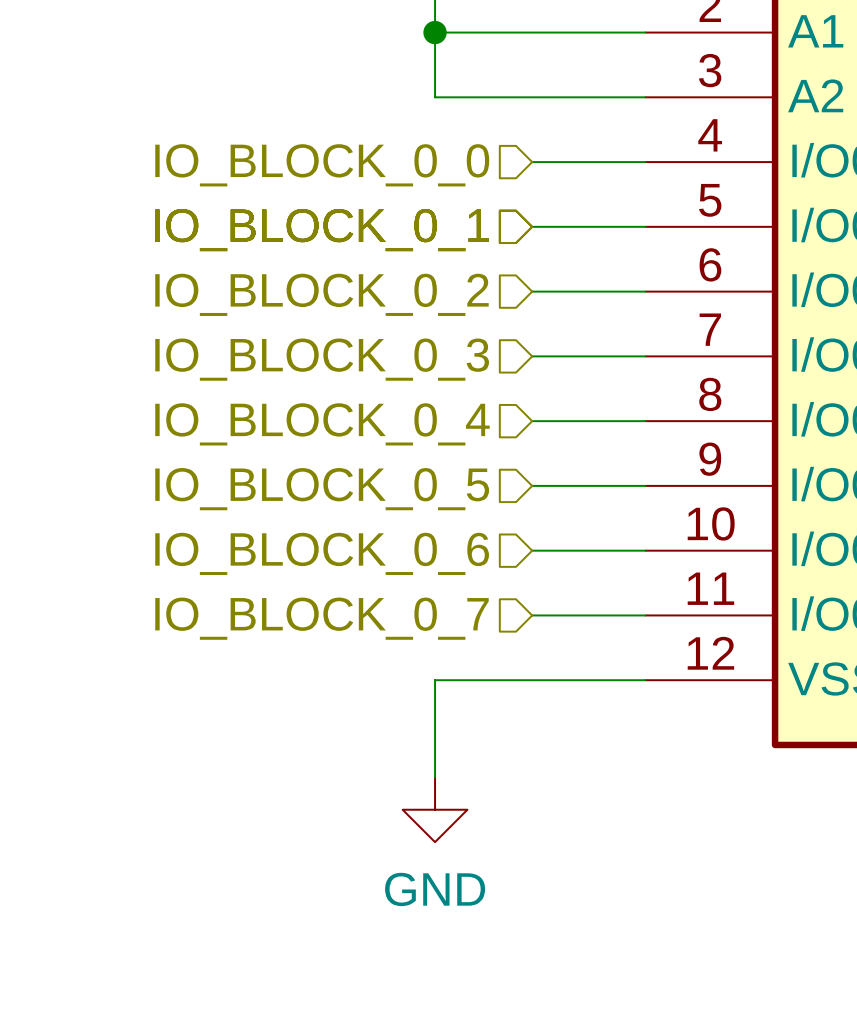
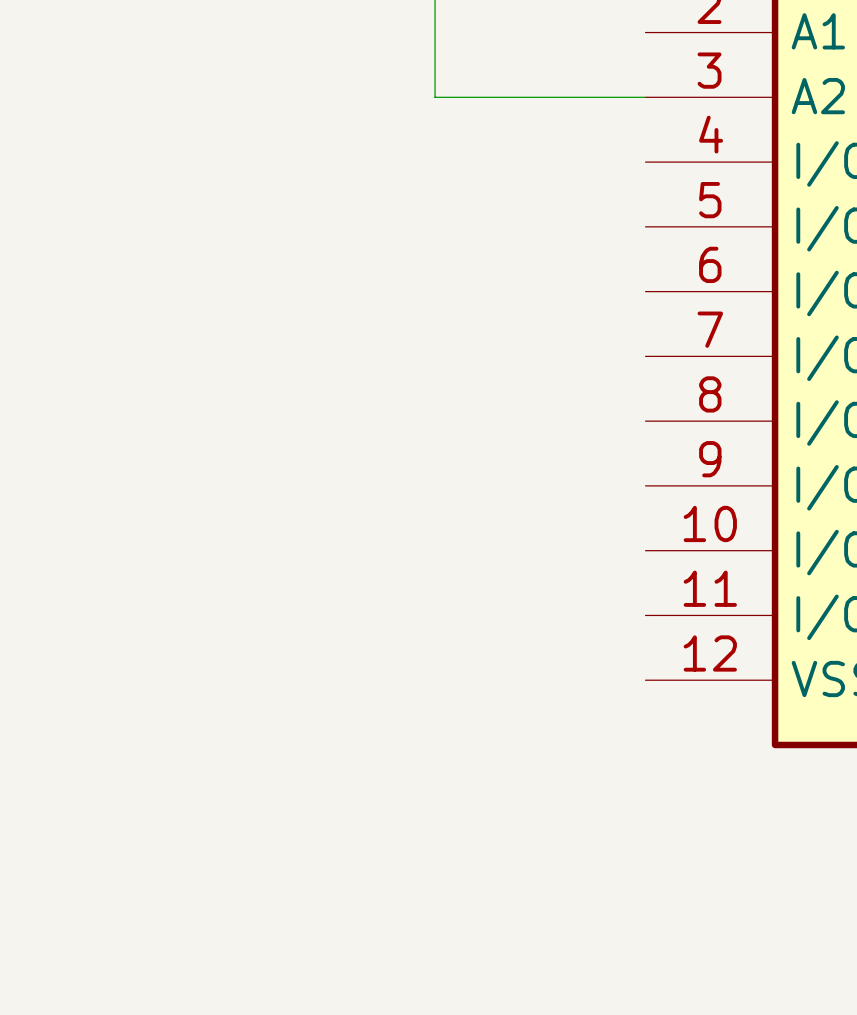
wire: (435, 32) (645, 32) -> none
junction: (435, 32) -> none
wire: (532, 162) (645, 162) -> none
hierarchical label: IO_BLOCK_0_0 (322, 165) -> none
wire: (532, 226) (645, 226) -> none
hierarchical label: IO_BLOCK_0_1 (322, 230) -> none
wire: (532, 291) (645, 291) -> none
hierarchical label: IO_BLOCK_0_2 (321, 294) -> none
wire: (532, 356) (645, 356) -> none
hierarchical label: IO_BLOCK_0_3 (322, 359) -> none
wire: (532, 421) (645, 421) -> none
hierarchical label: IO_BLOCK_0_4 (322, 424) -> none
wire: (532, 485) (645, 485) -> none
hierarchical label: IO_BLOCK_0_5 (322, 489) -> none
wire: (532, 550) (645, 550) -> none
hierarchical label: IO_BLOCK_0_6 (322, 553) -> none
wire: (532, 615) (645, 615) -> none
hierarchical label: IO_BLOCK_0_7 (321, 618) -> none
wire: (645, 680) (435, 680) (435, 777) -> none
power symbol: GND (435, 809) -> none

